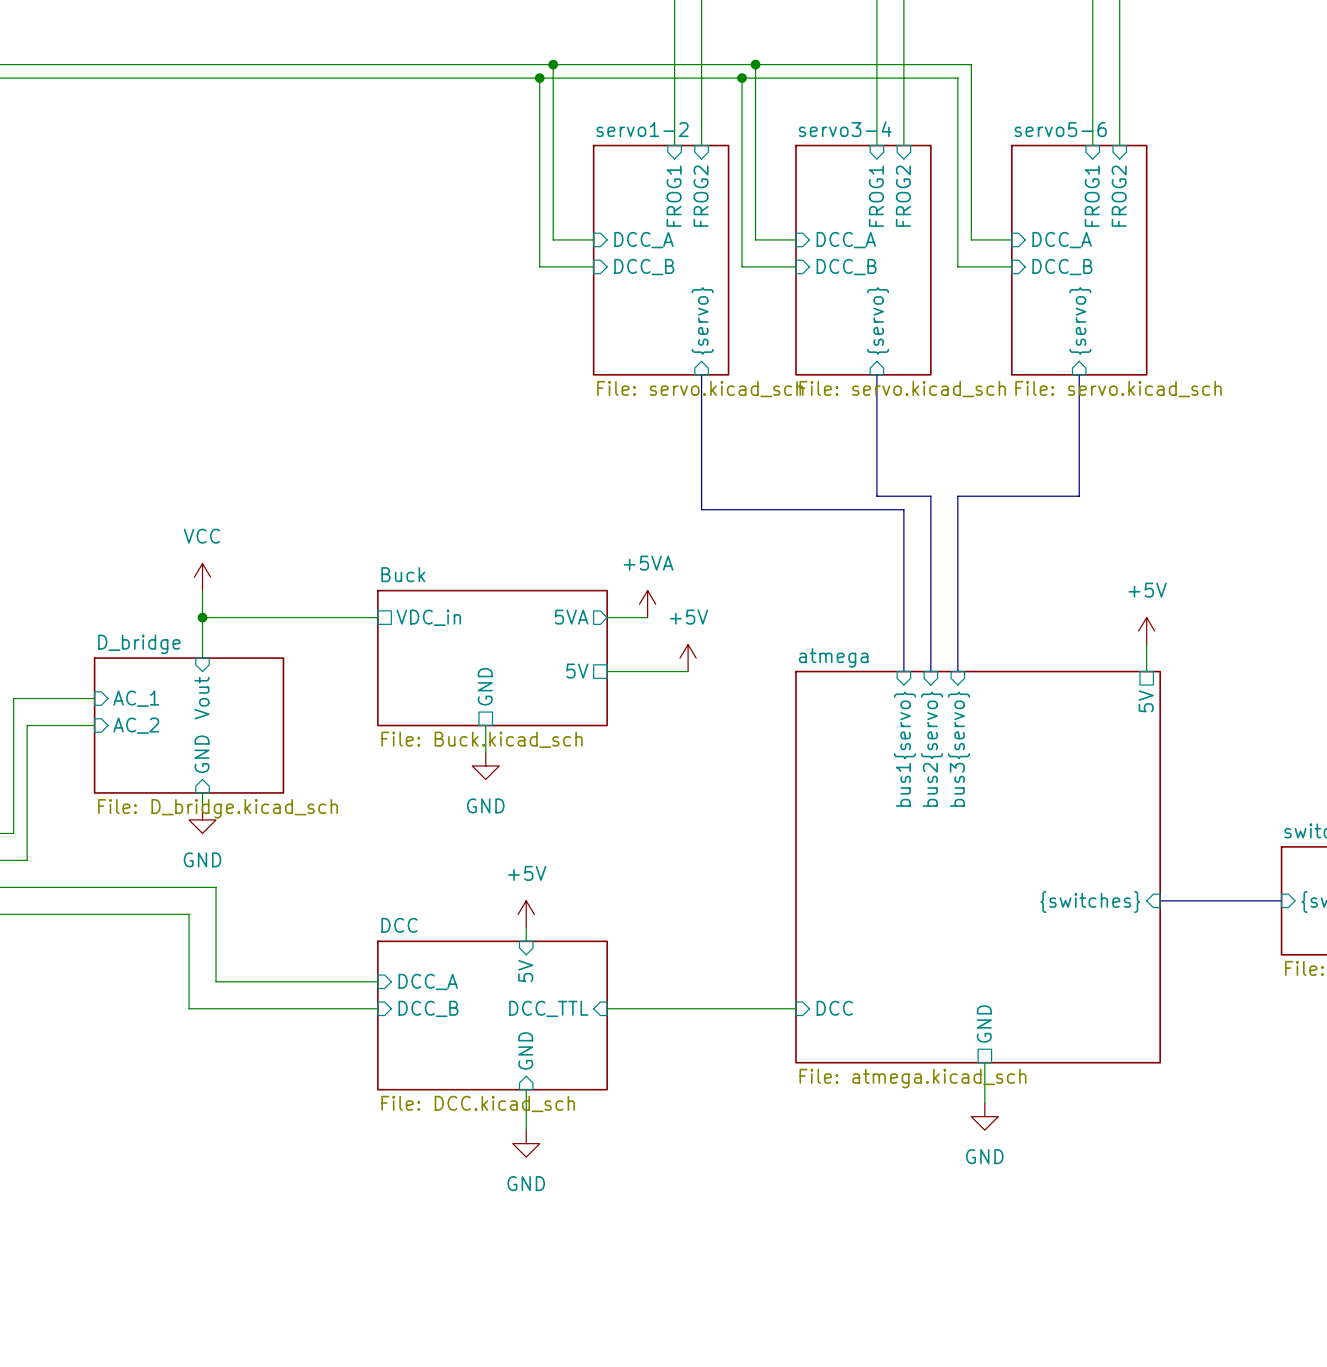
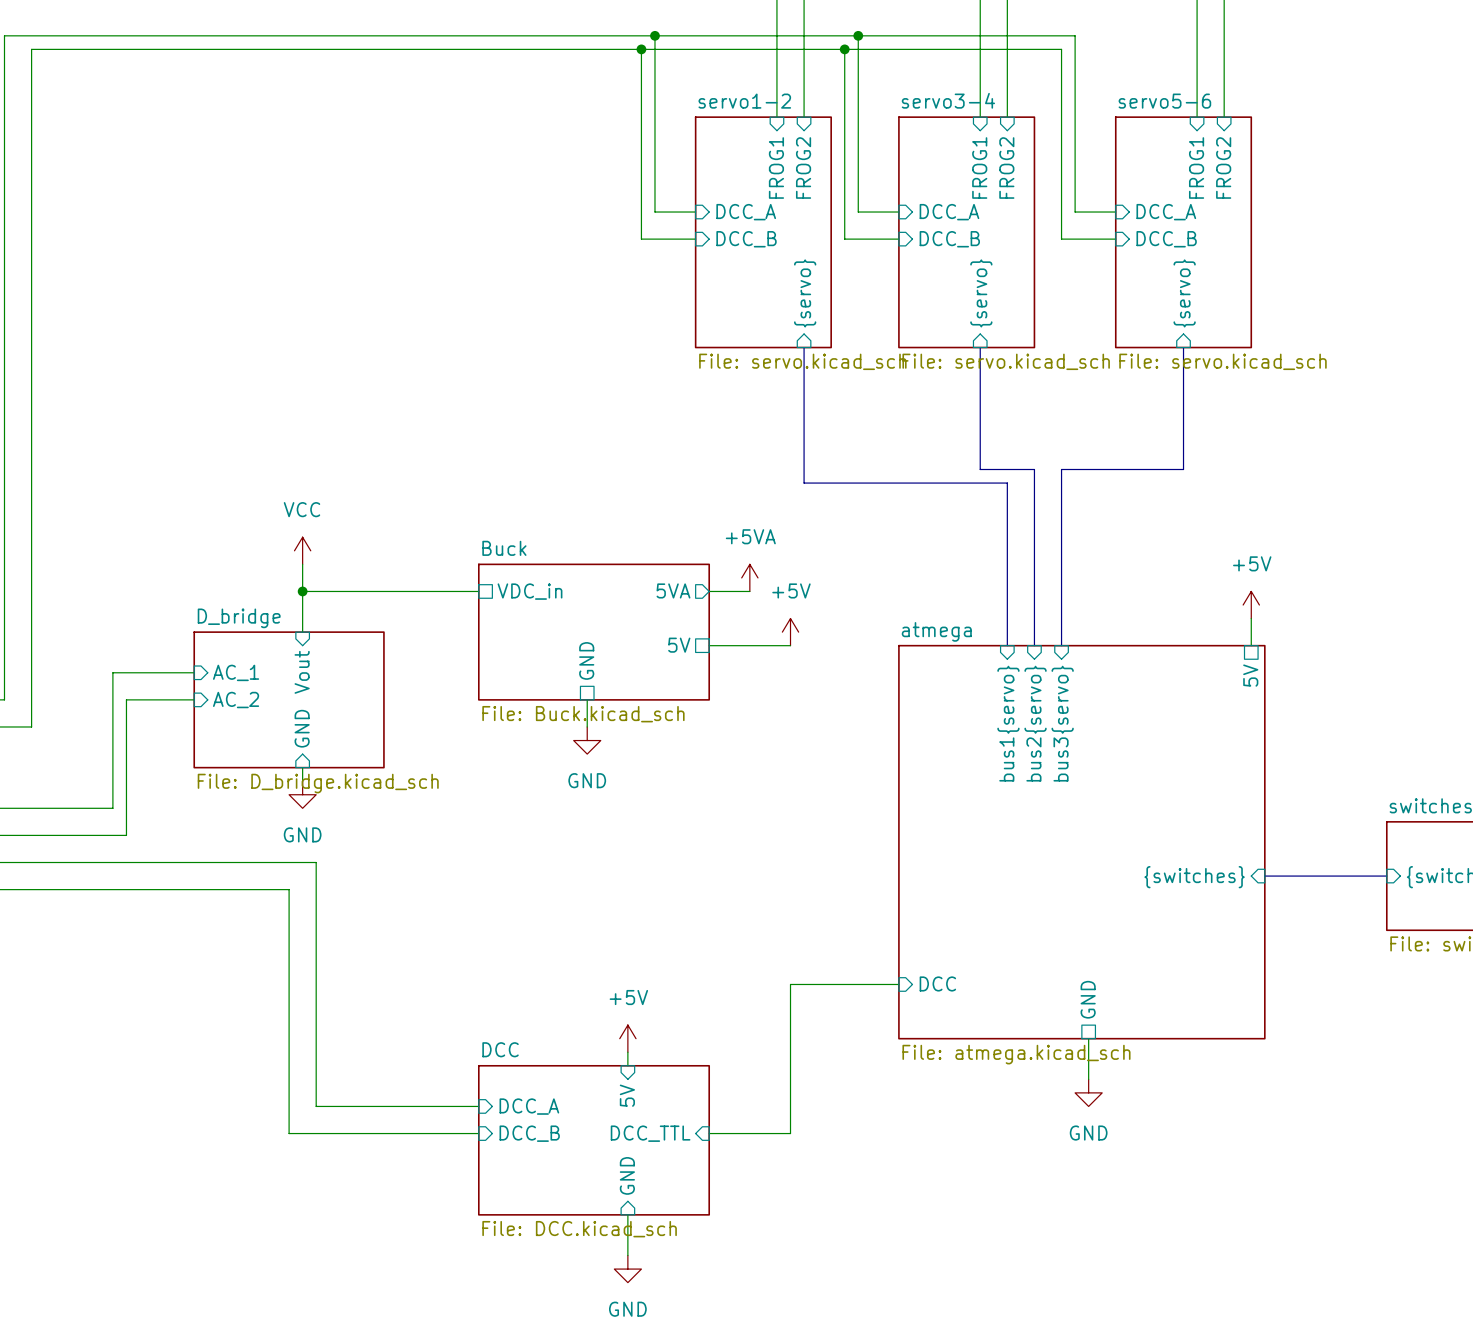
power symbol position: +5V (526, 914) -> +5V (627, 1038)
wire: (526, 927) (526, 941) -> none
sheet pin position: 5V (525, 971) -> 5V (627, 1095)
wire: (216, 981) (377, 981) -> (316, 957) (316, 1106) (478, 1106)
sheet pin position: DCC_A (428, 981) -> DCC_A (529, 1106)
wire: (189, 1008) (377, 1008) -> (289, 984) (289, 1133) (478, 1133)
sheet pin position: DCC_B (428, 1008) -> DCC_B (529, 1133)
sheet pin position: DCC_TTL (548, 1008) -> DCC_TTL (650, 1133)
wire: (607, 1008) (688, 1008) -> (709, 1133) (790, 1133) (790, 984)
sheet DCC position: (492, 1015) -> (594, 1140)
sheet pin position: GND (525, 1050) -> GND (627, 1175)
wire: (526, 1089) (526, 1130) -> (627, 1065) (627, 1052)
power symbol position: GND (526, 1143) -> GND (627, 1269)
wire: none -> (627, 1214) (627, 1255)

